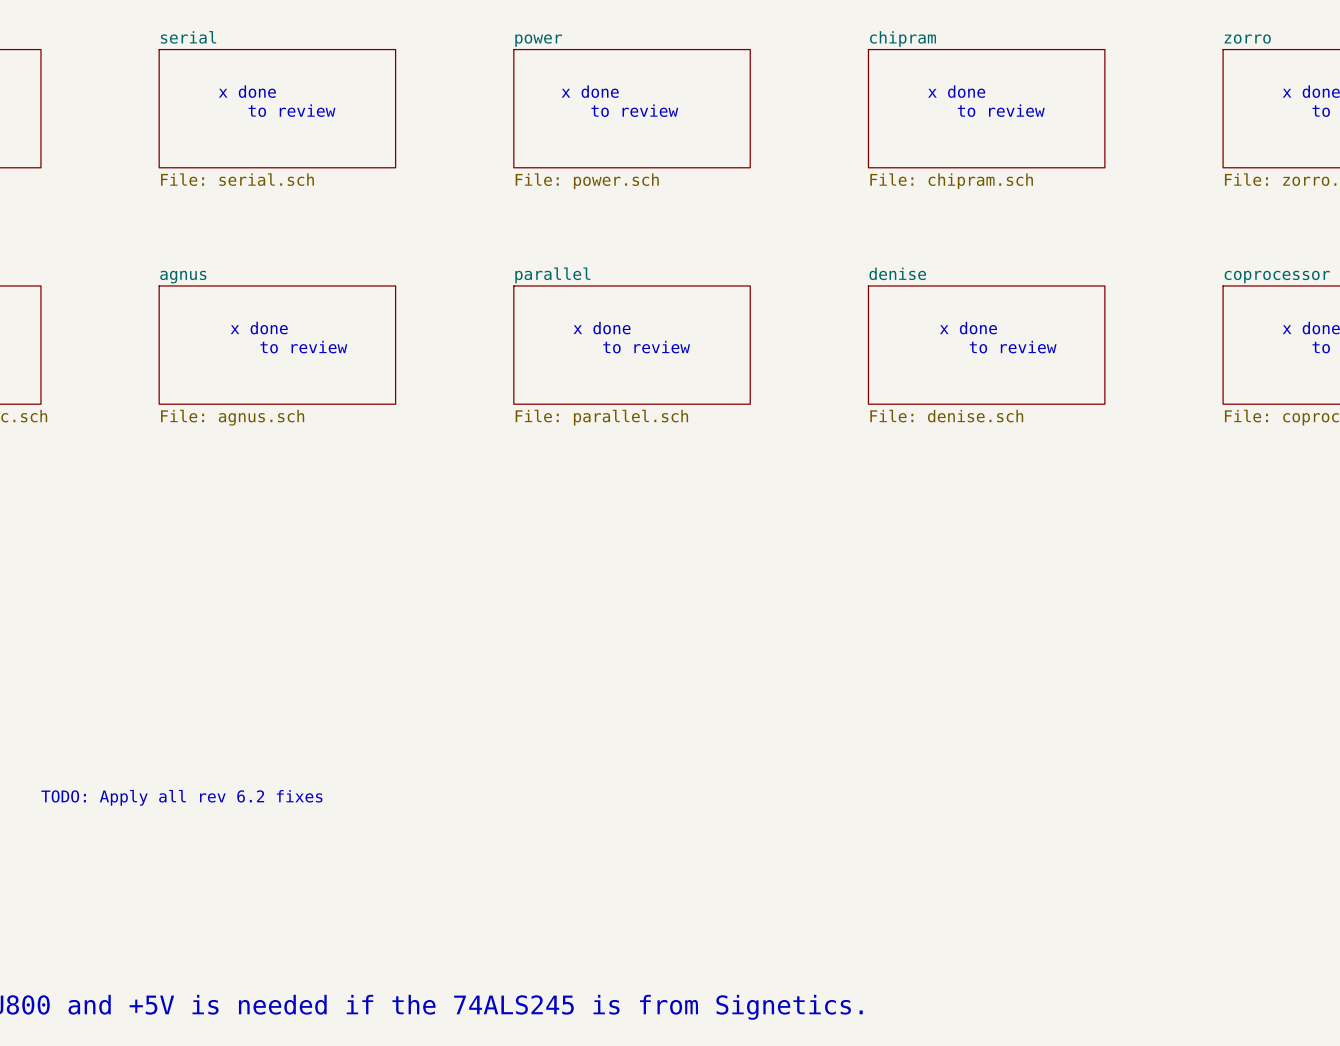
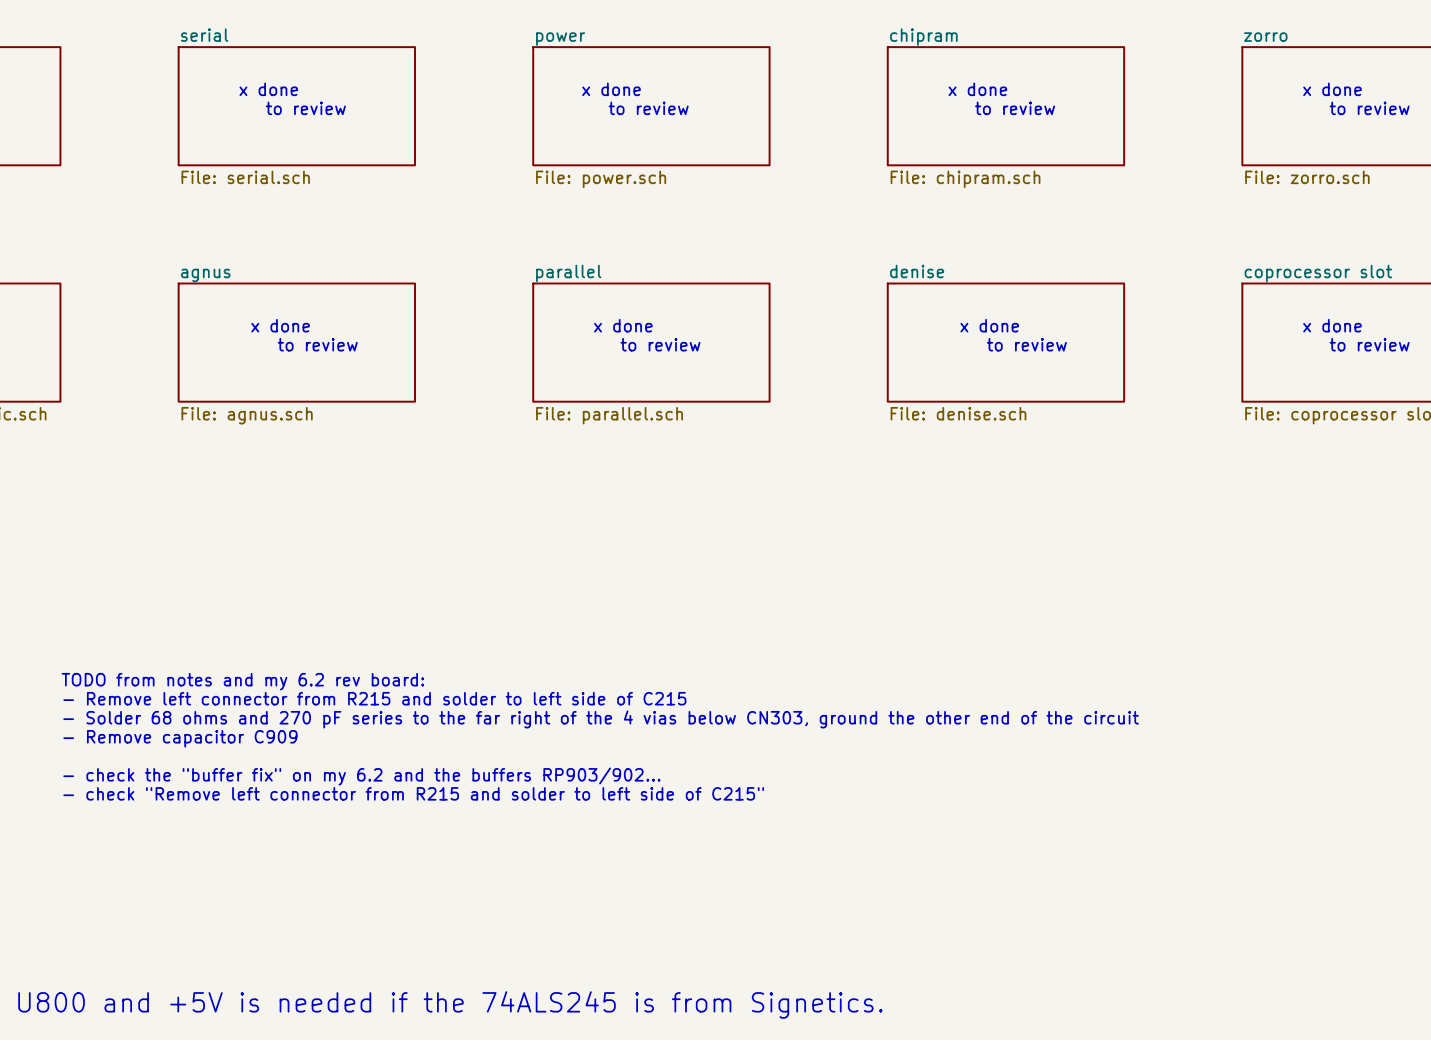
text: none -> TODO from notes and my 6.2 rev board: (242, 681)
text: none -> - Remove left connector from R215 and solder to left side of C215 (374, 698)
text: none -> - Solder 68 ohms and 270 pF series to the far right of the 4 vias below CN303, ground the other end of the circuit (601, 719)
text: none -> - Remove capacitor C909 (180, 738)
text: none -> - check the "buffer fix" on my 6.2 and the buffers RP903/902... (361, 776)
text: TODO: Apply all rev 6.2 fixes (181, 797) -> - check "Remove left connector from R215 and solder to left side of C215" (413, 793)

